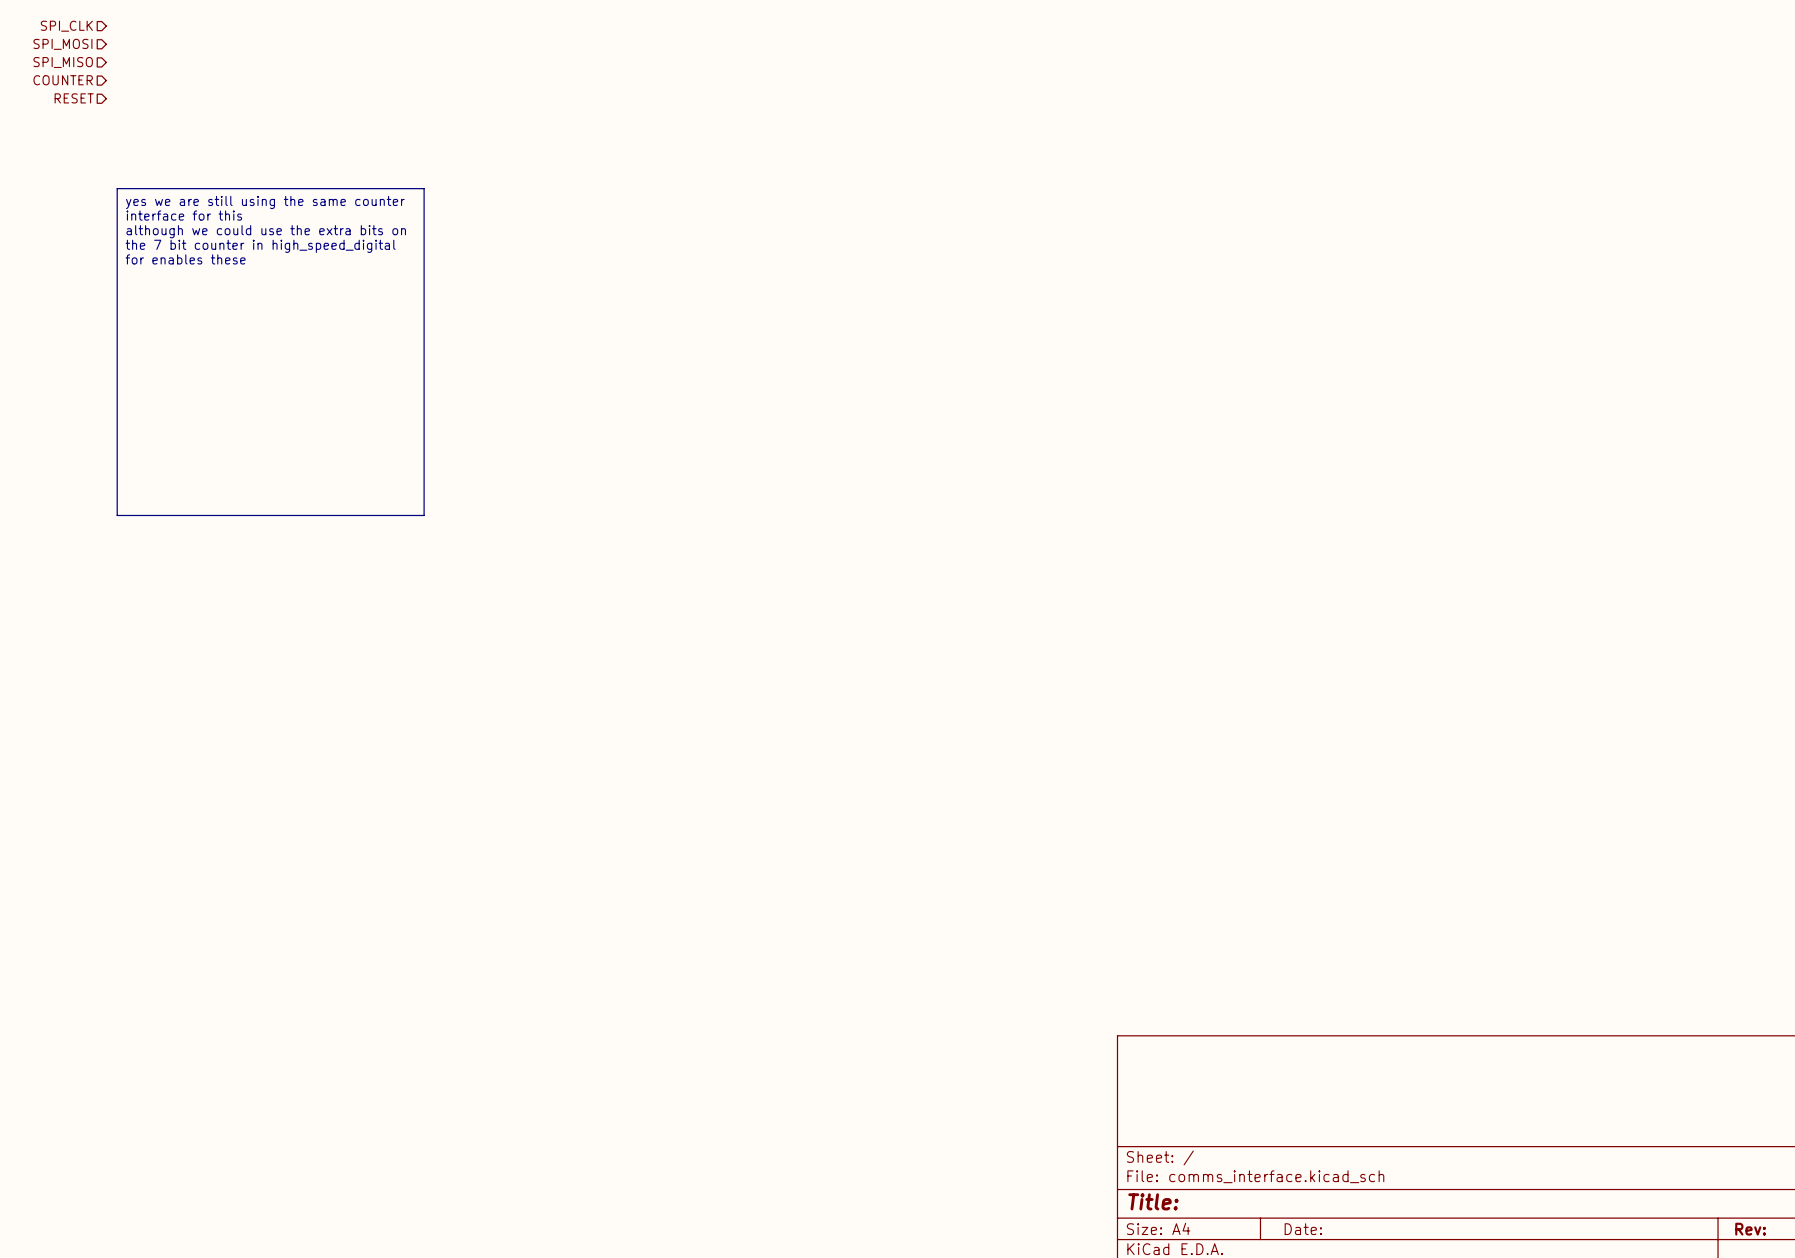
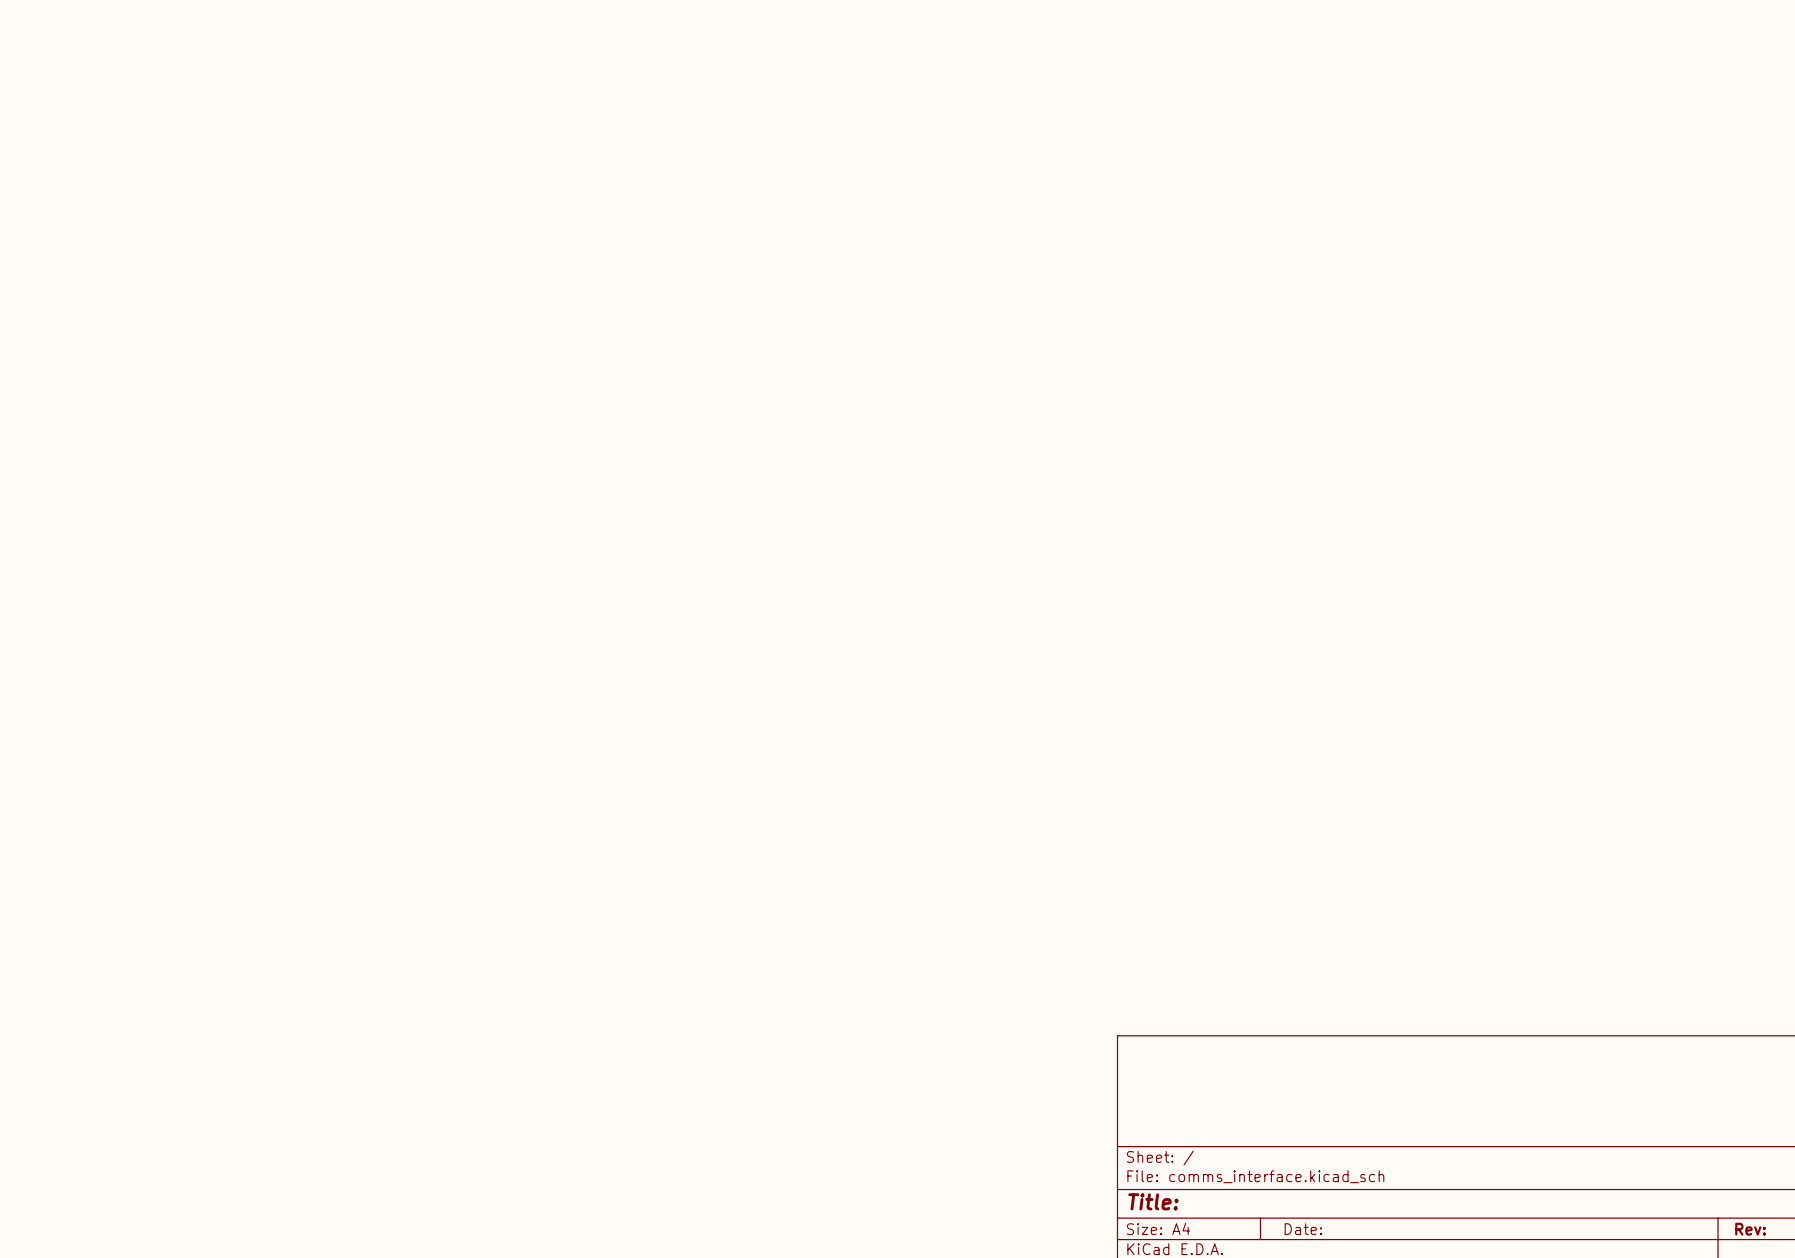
hierarchical label: SPI_CLK (66, 26) -> none
hierarchical label: SPI_MOSI (62, 44) -> none
hierarchical label: SPI_MISO (63, 62) -> none
hierarchical label: COUNTER (63, 80) -> none
hierarchical label: RESET (74, 98) -> none
line: (117, 188) (424, 188) (424, 515) (117, 515) (117, 188) -> none
text: yes we are still using the same counter (265, 202) -> none
text: interface for this (184, 215) -> none
text: although we could use the extra bits on (266, 231) -> none
text: the 7 bit counter in high_speed_digital (260, 246) -> none
text: for enables these (185, 259) -> none

